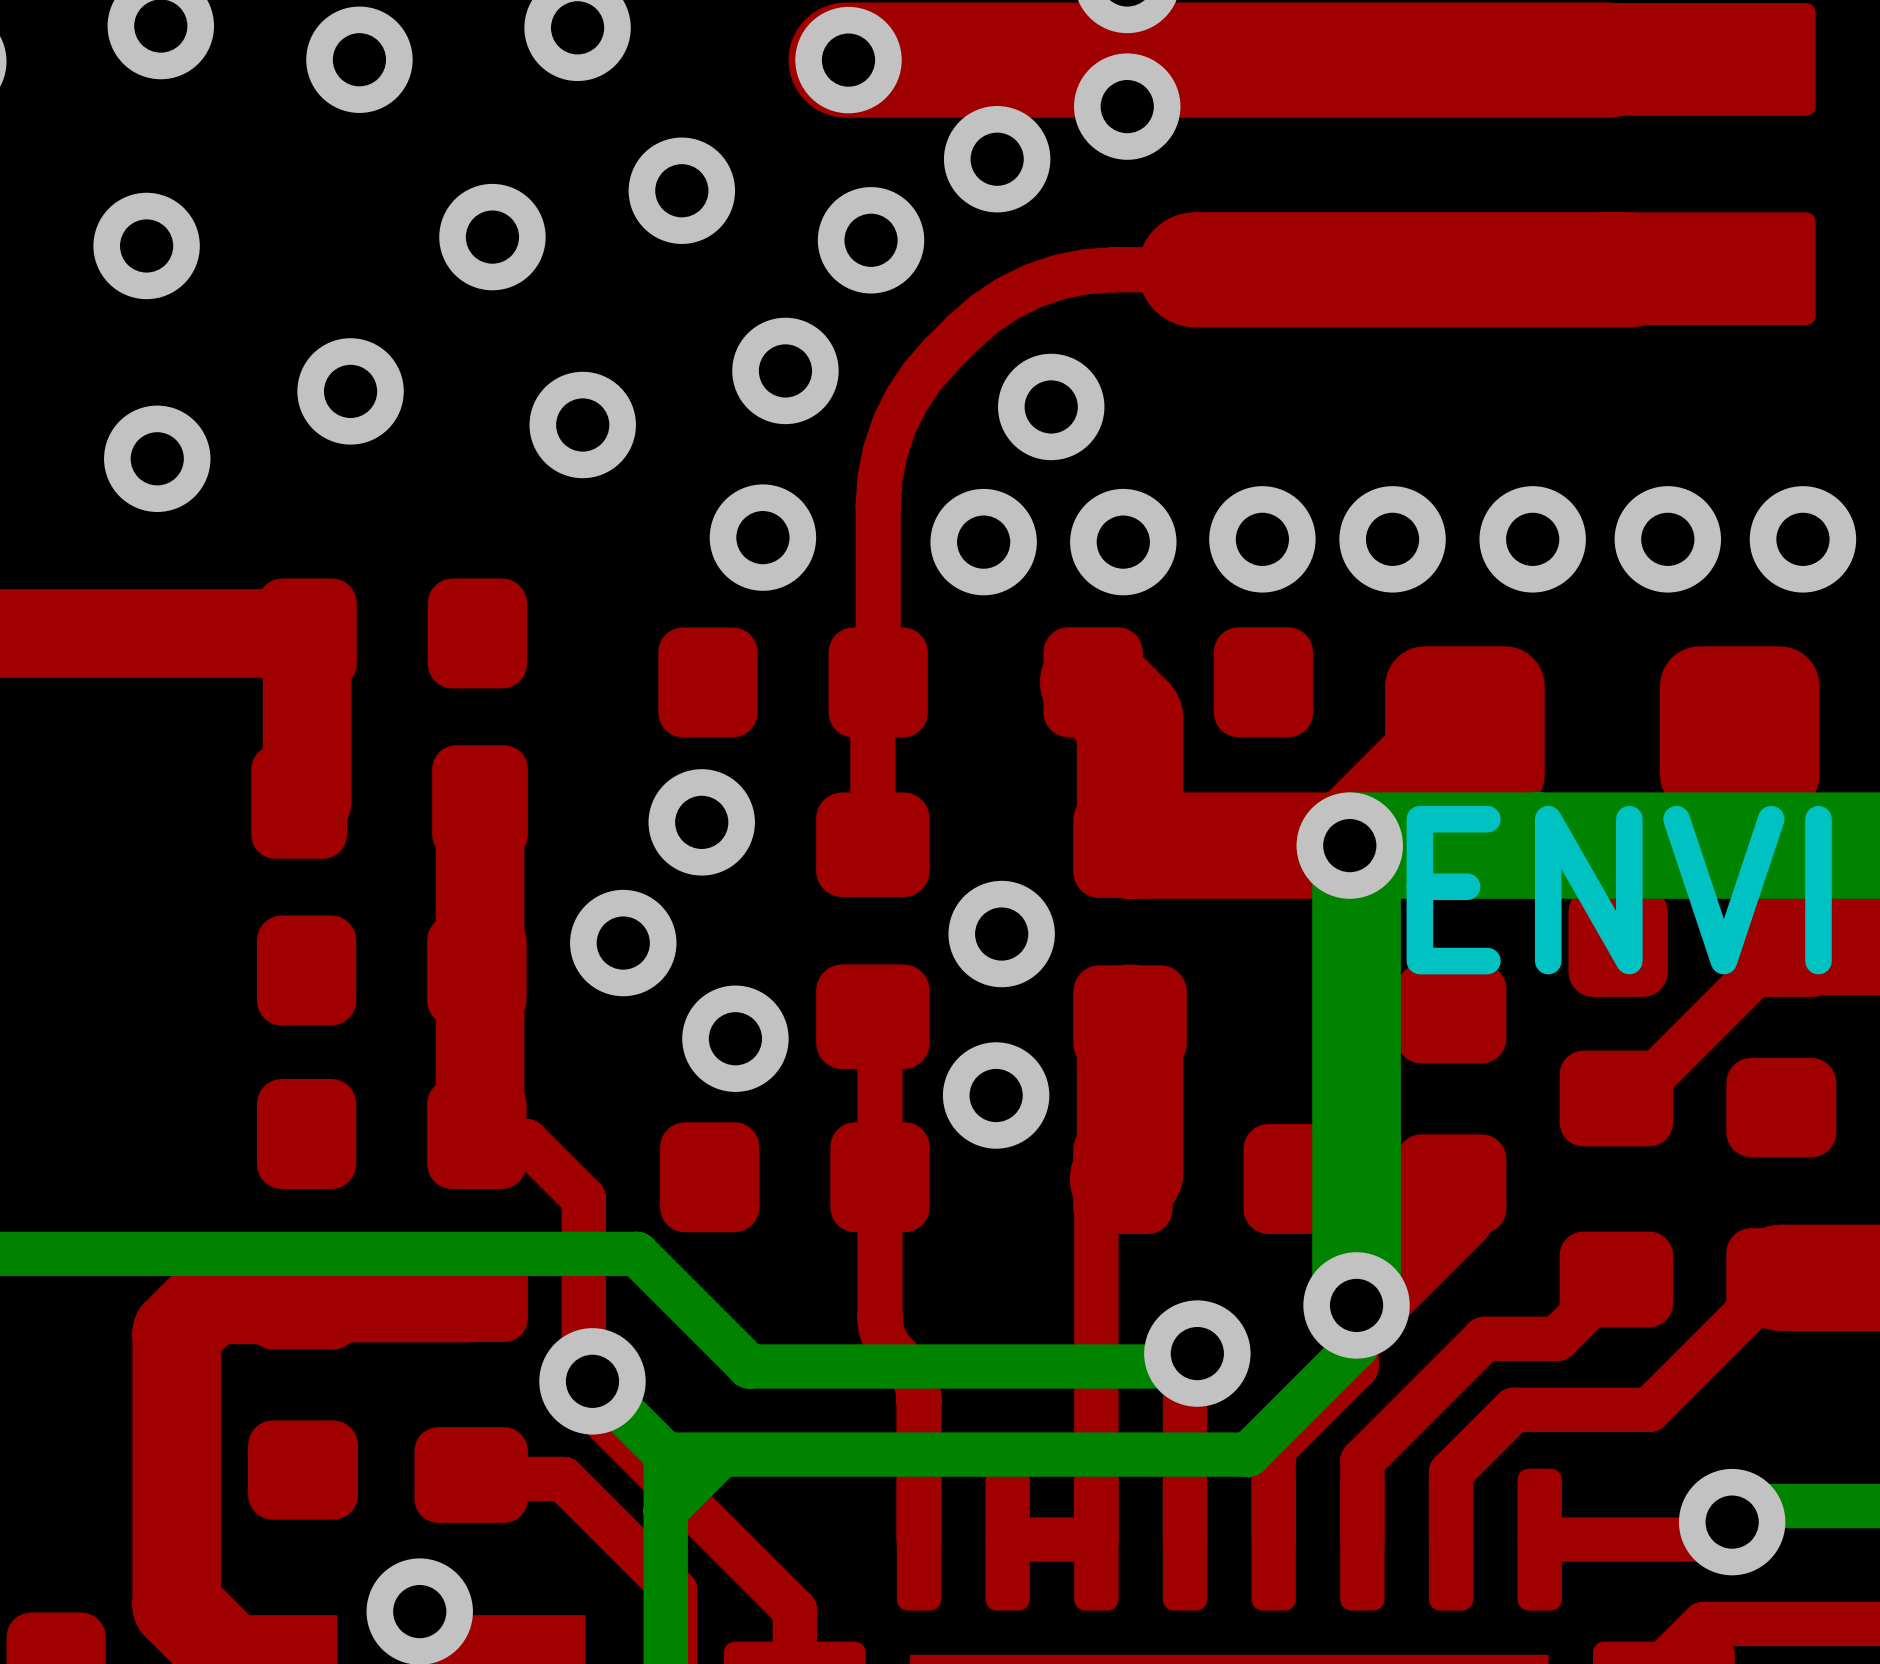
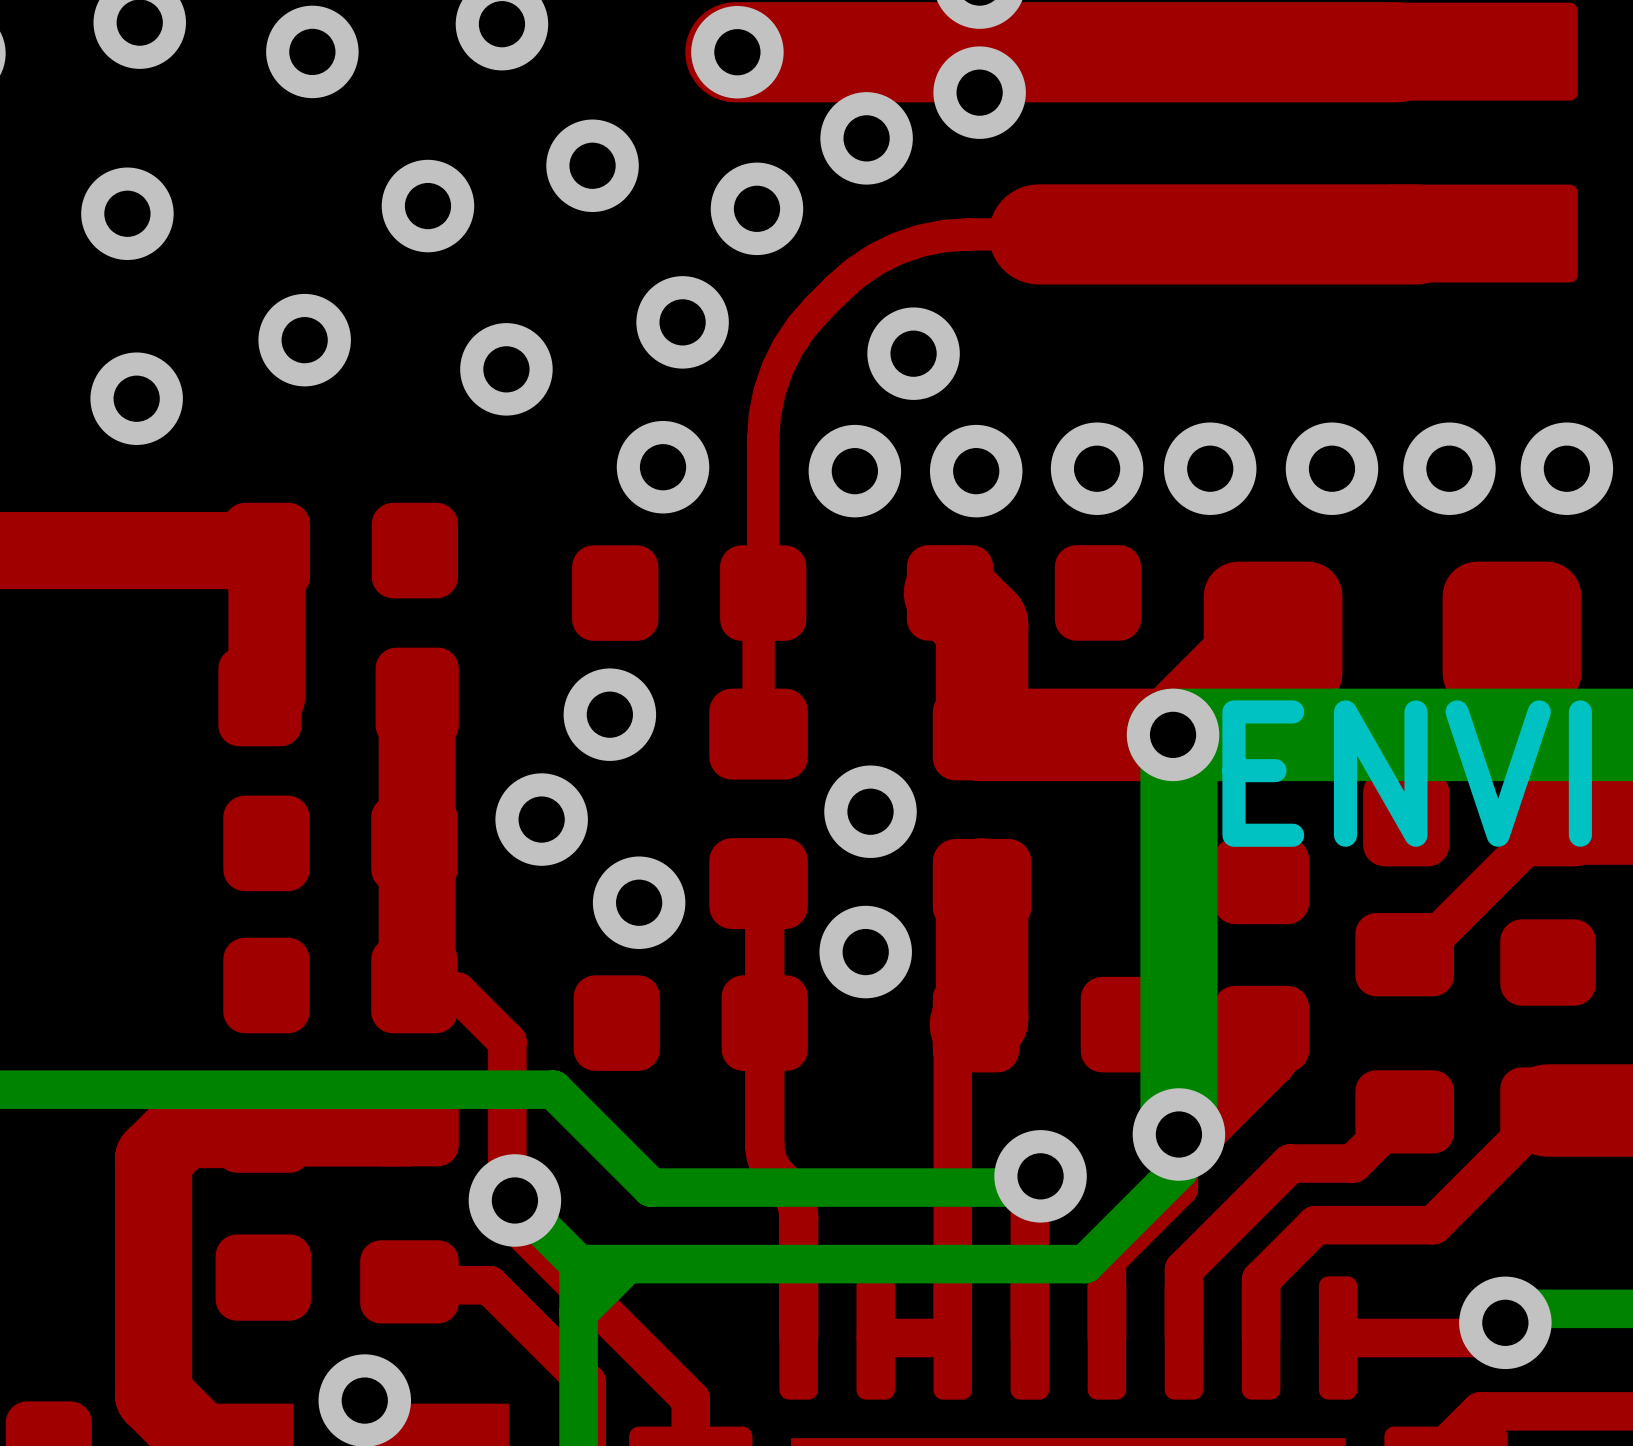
top track width: thick (1195, 269) (1086, 271) (1059, 276) (1033, 285) (1008, 298) (984, 313) (963, 332) (922, 376) (906, 399) (894, 424) (885, 450) (880, 478) (878, 505) (878, 682) (872, 687) (872, 844) -> thin (1038, 234) (944, 236) (920, 240) (897, 248) (876, 259) (855, 272) (837, 288) (801, 327) (787, 347) (777, 368) (769, 391) (764, 415) (763, 593) (758, 597) (758, 734)

